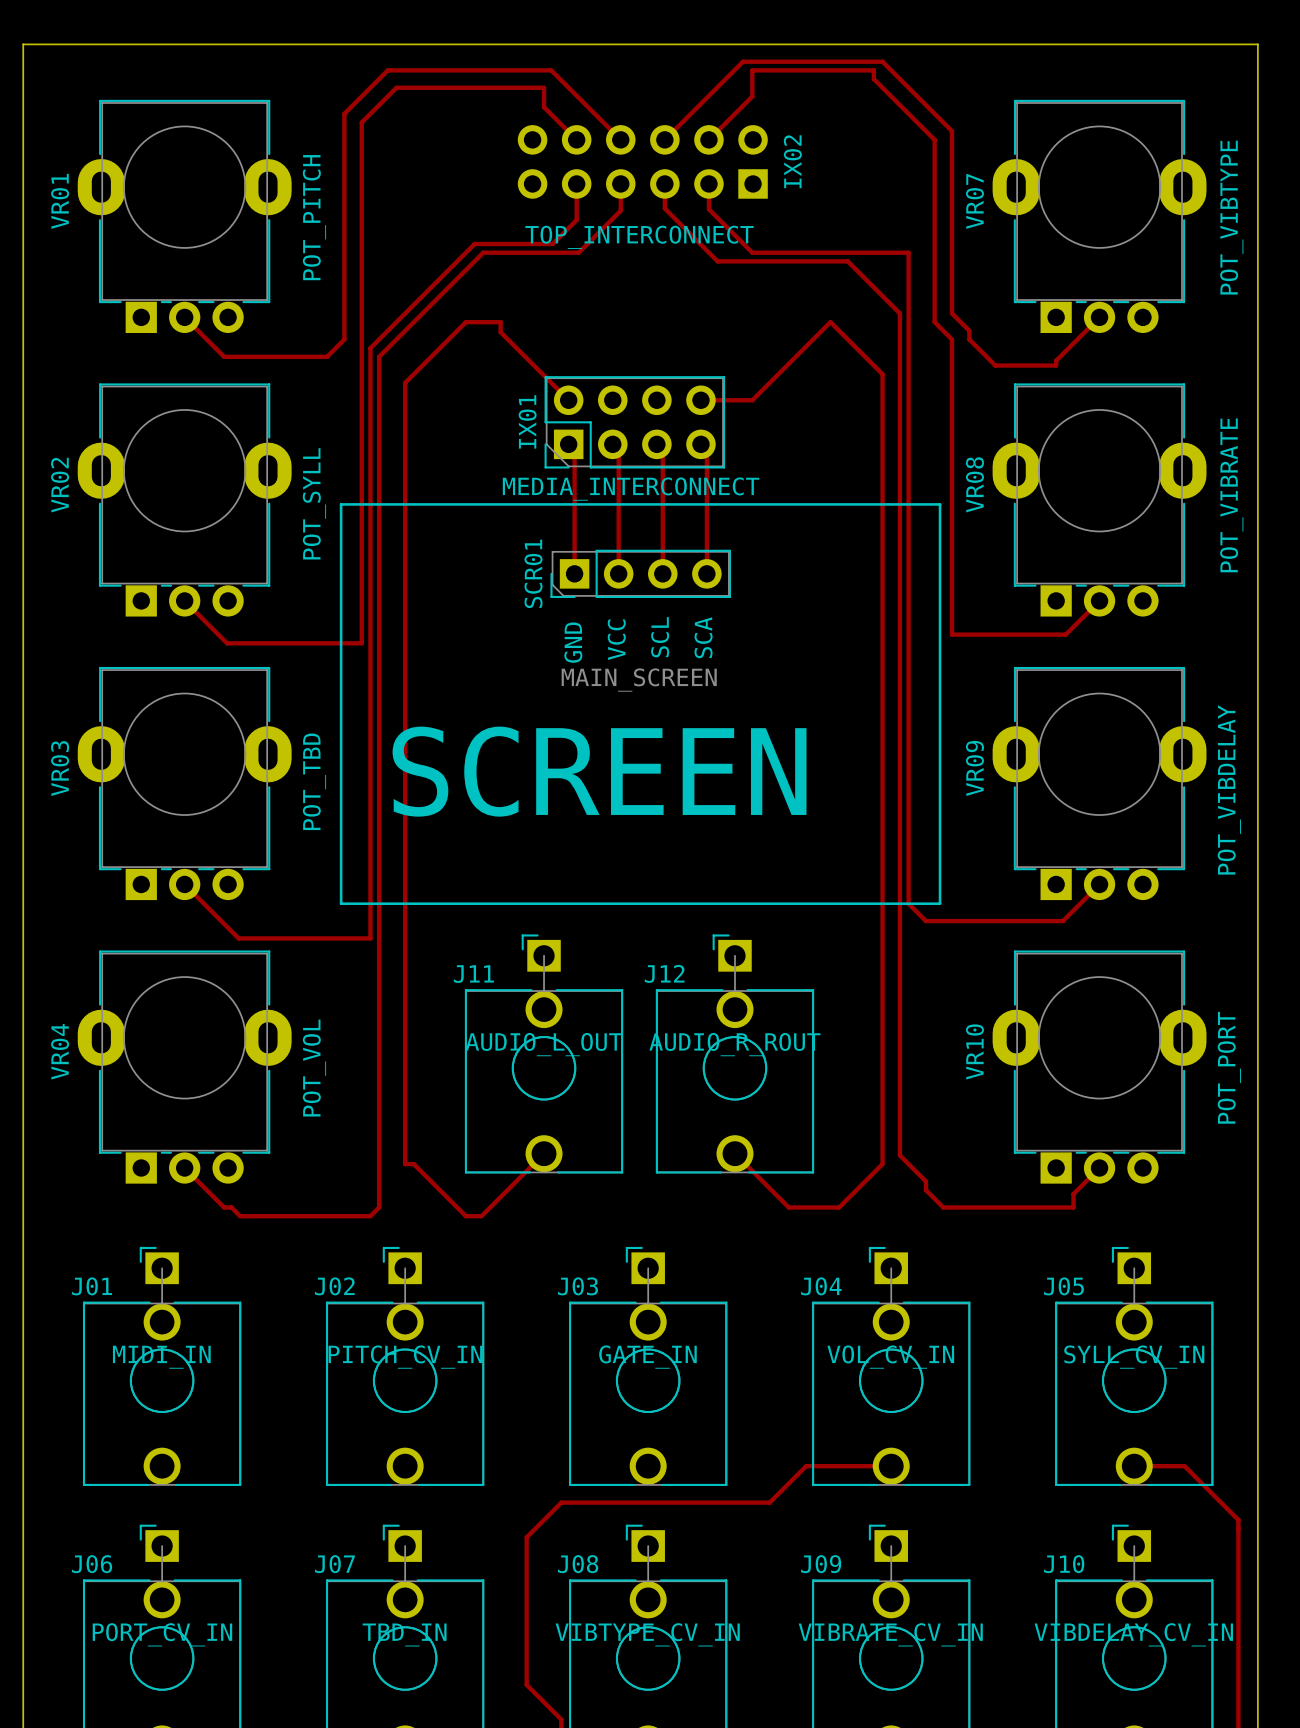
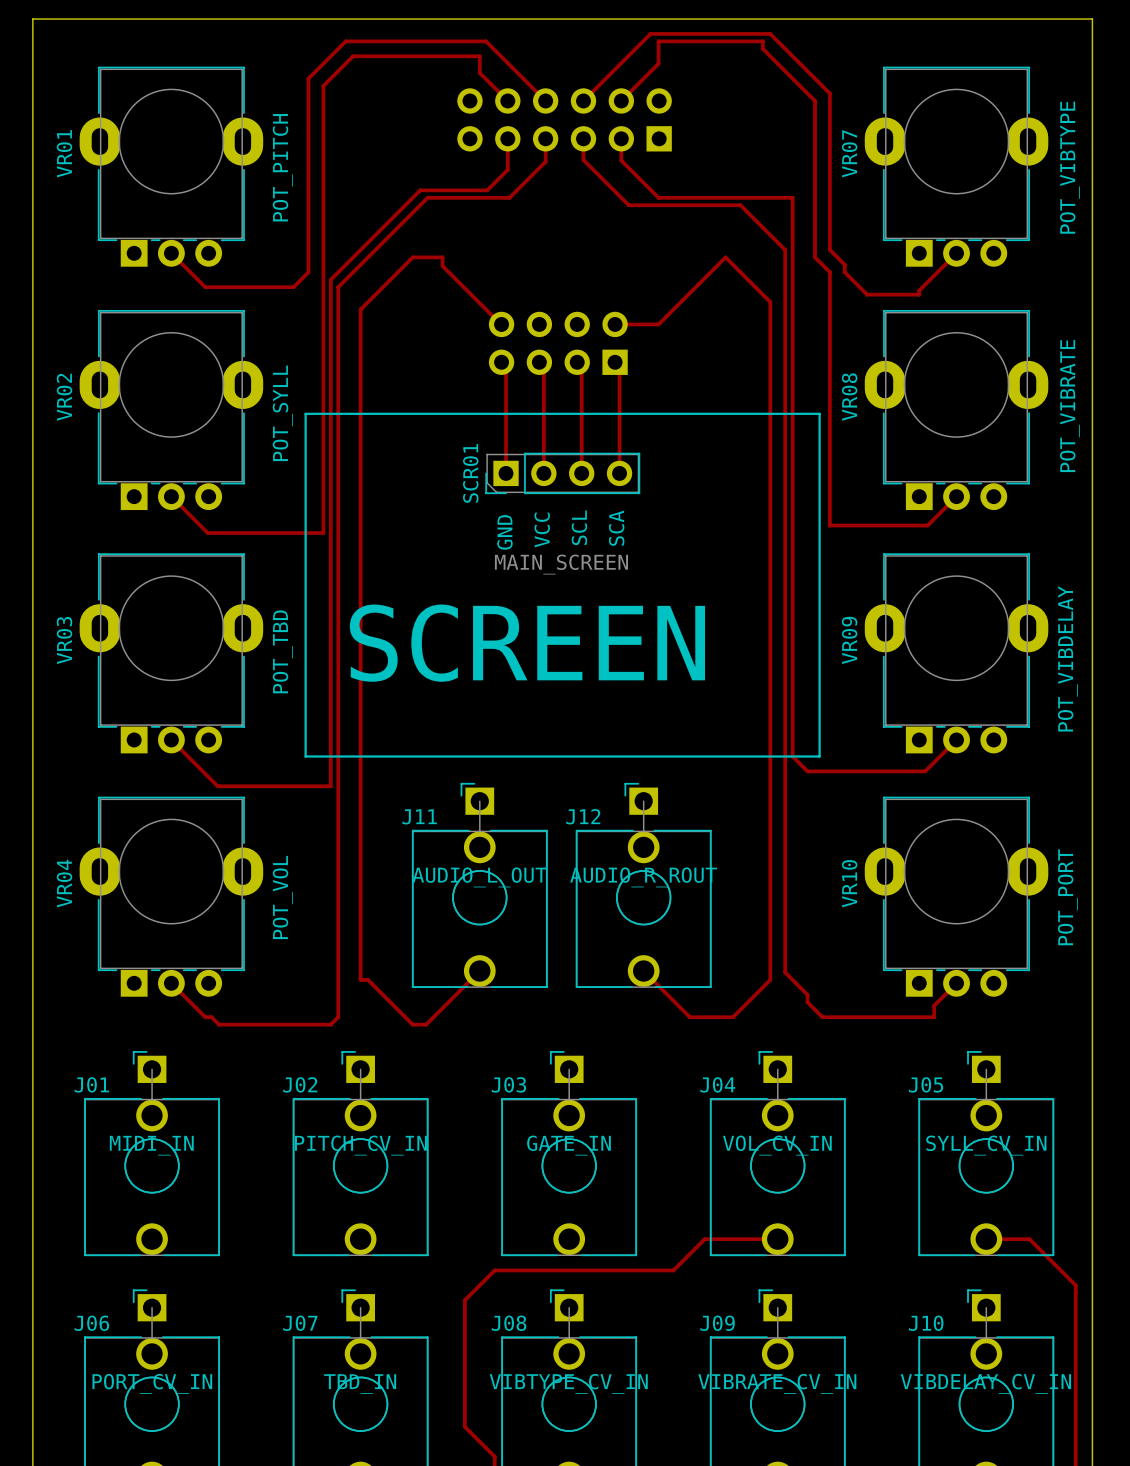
IX02 name: IX02 (792, 161) -> none
IX02 value: TOP_INTERCONNECT (639, 237) -> none
IX01 side: top (634, 422) -> bottom (558, 343)

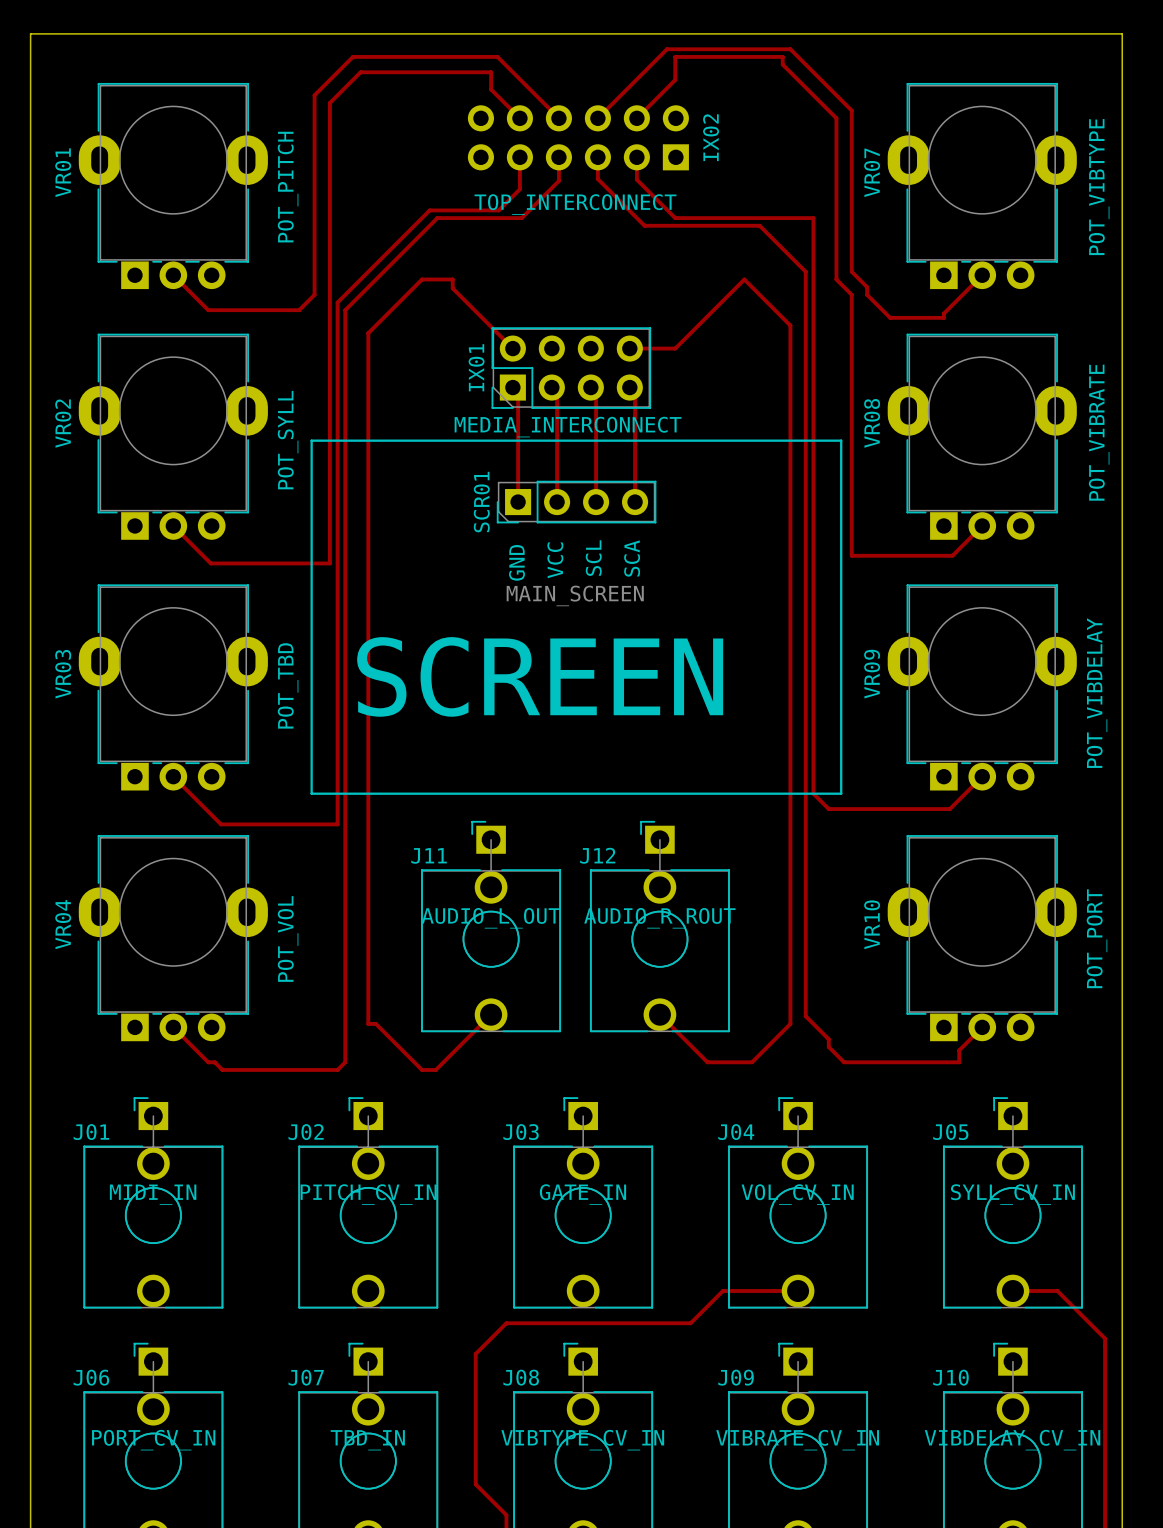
IX02 name: none -> IX02 (711, 137)
IX02 value: none -> TOP_INTERCONNECT (575, 204)
IX01 side: bottom (558, 343) -> top (571, 368)

